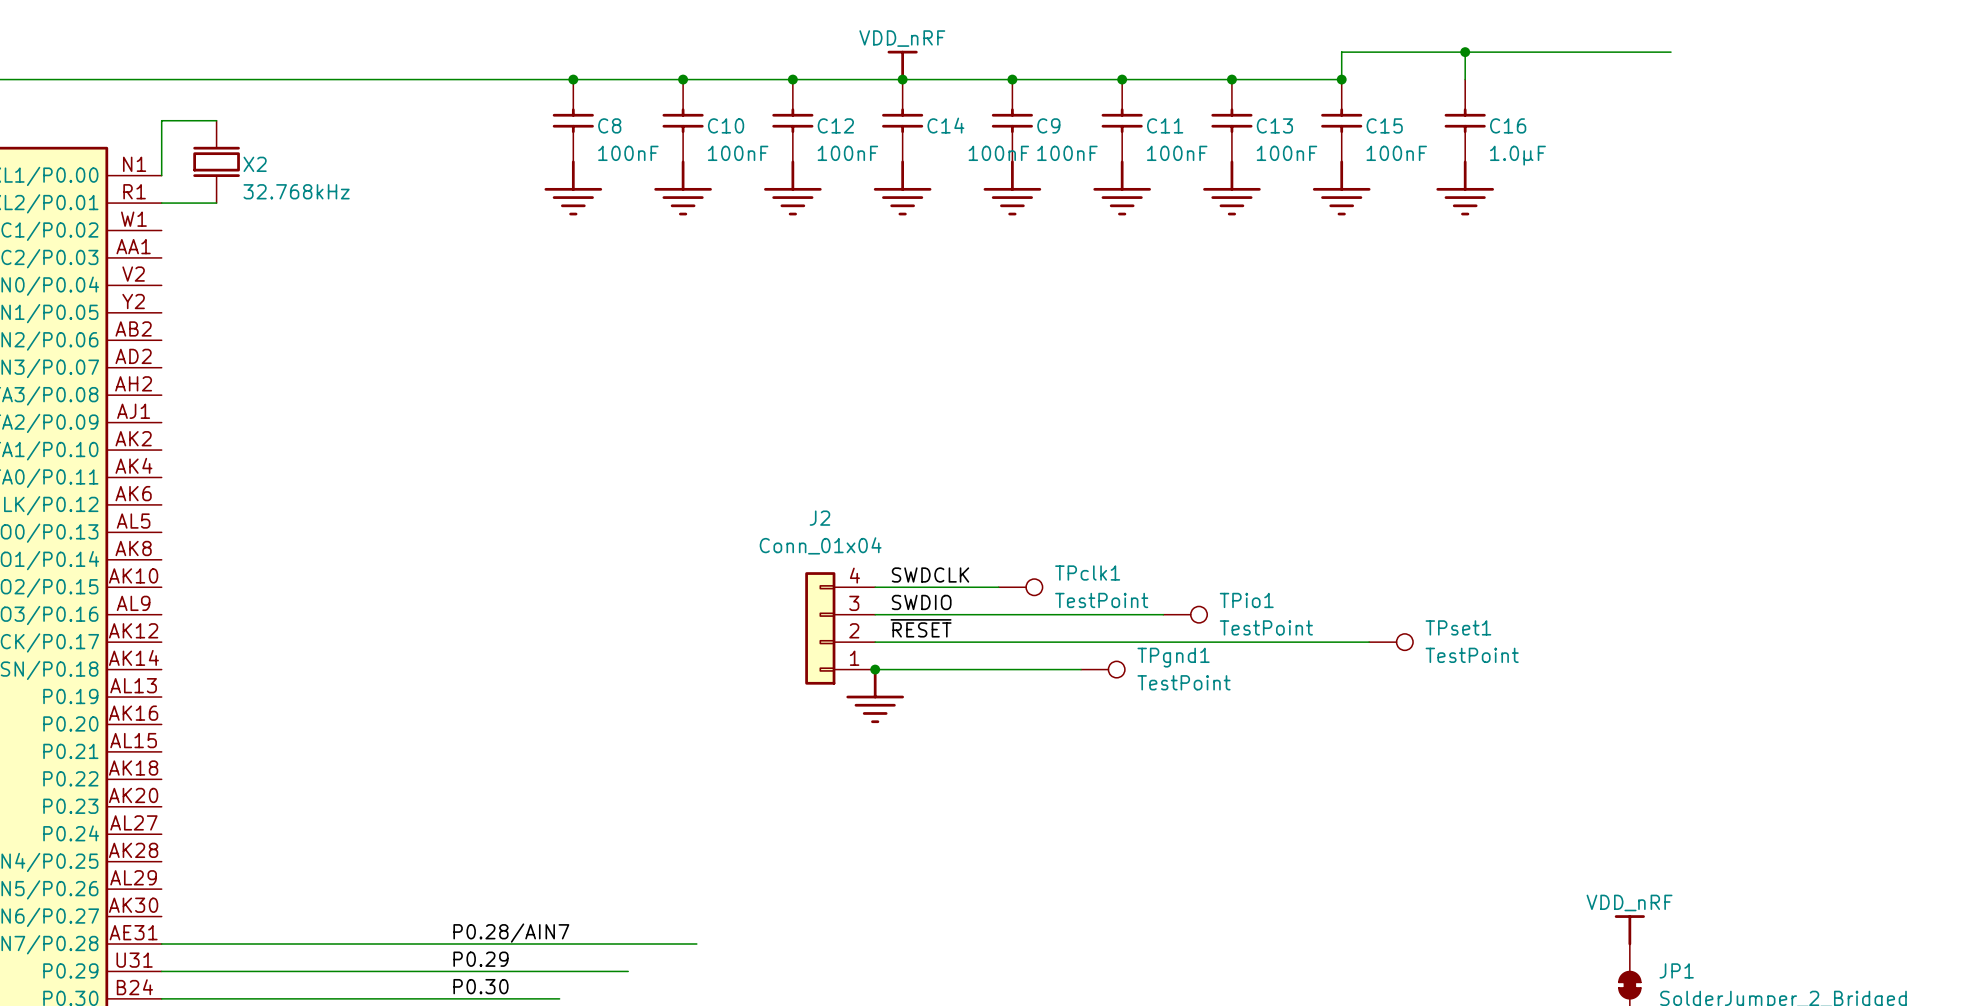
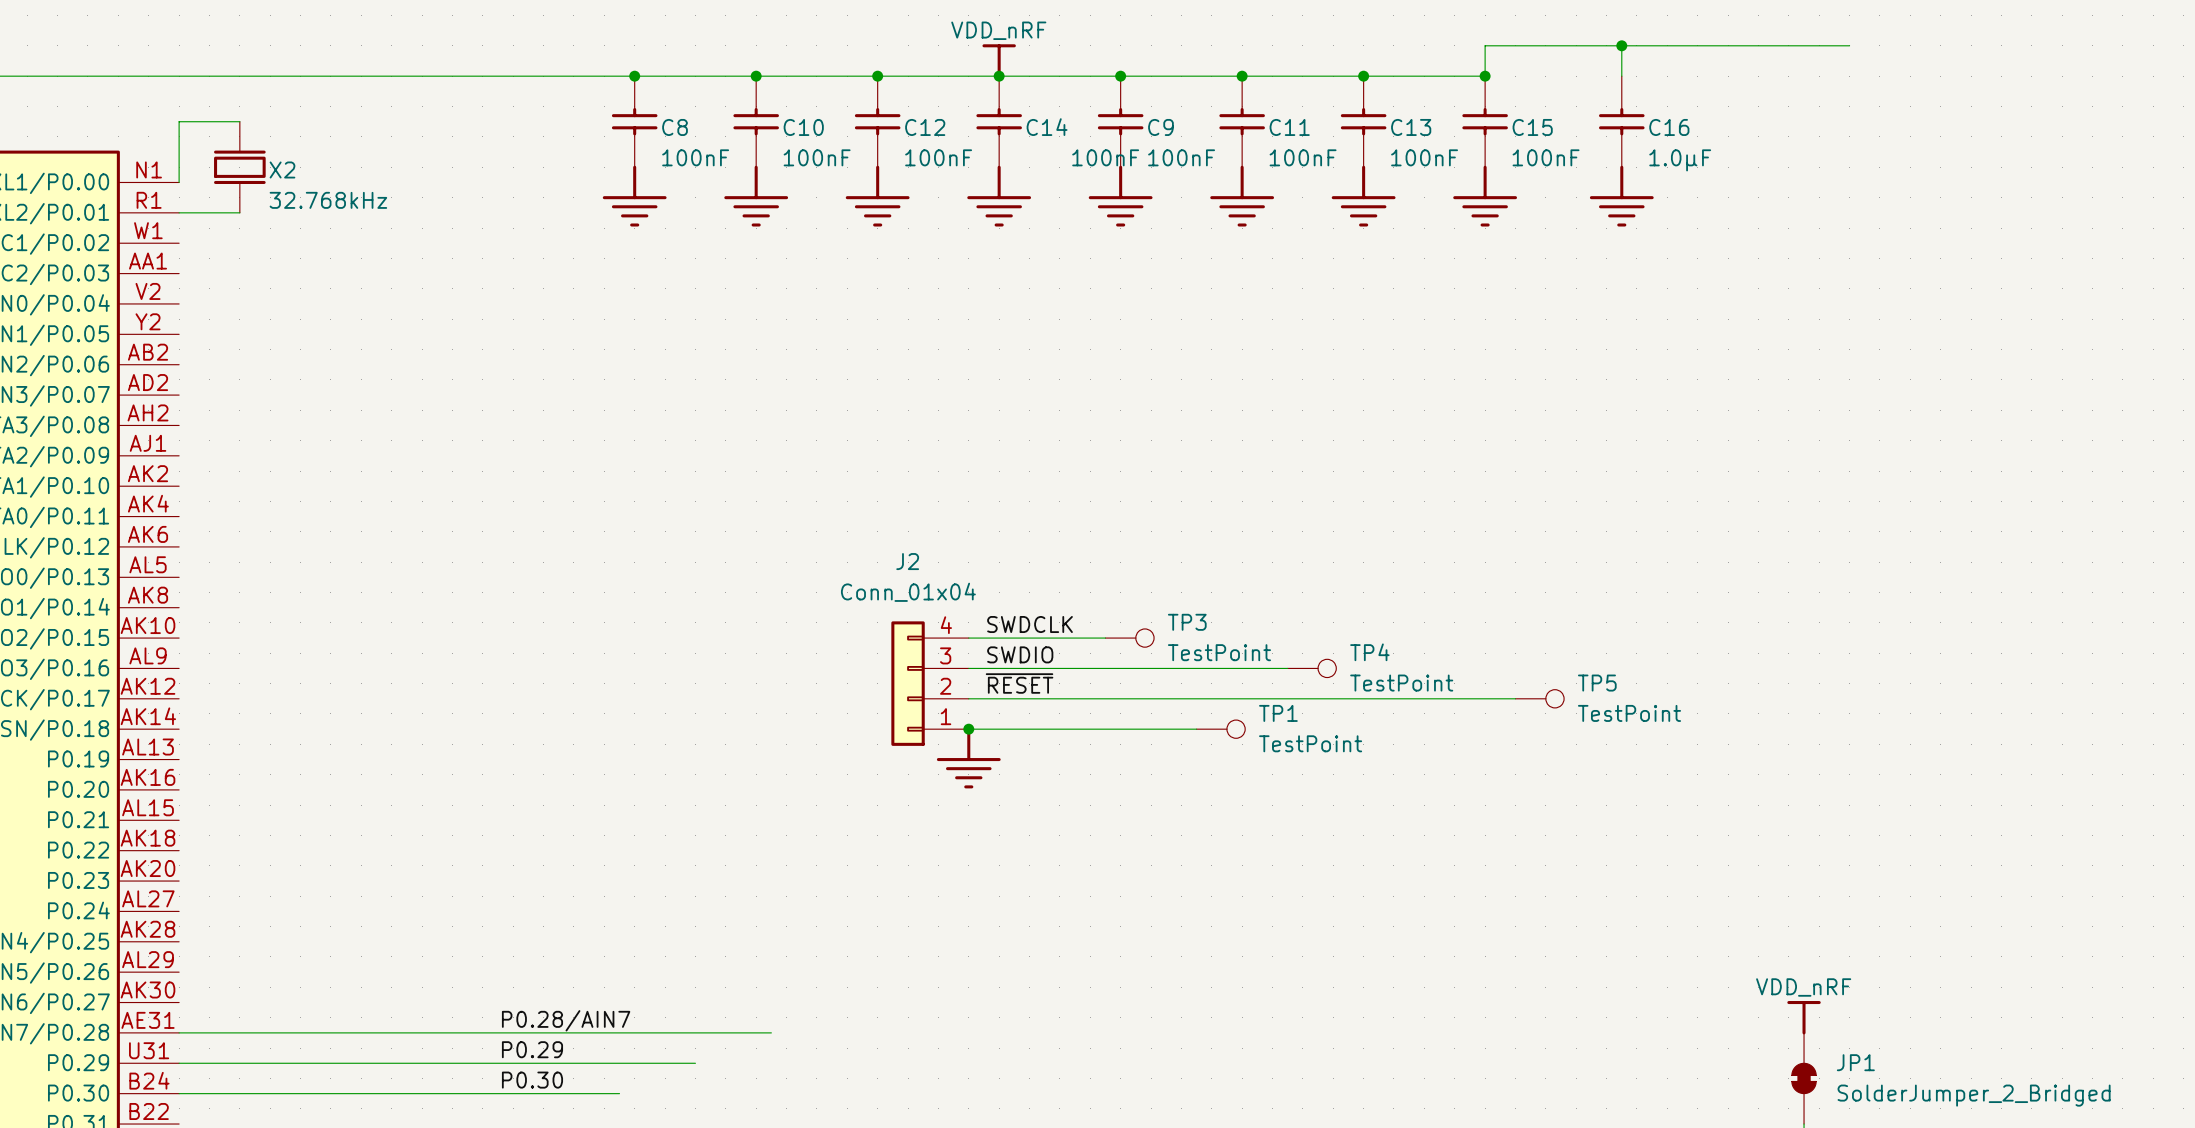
TPclk1 name: TPclk1 (1087, 573) -> TP3 (1187, 622)
TPio1 name: TPio1 (1246, 600) -> TP4 (1369, 652)
TPset1 name: TPset1 (1458, 627) -> TP5 (1597, 683)
TPgnd1 name: TPgnd1 (1173, 657) -> TP1 (1278, 713)

